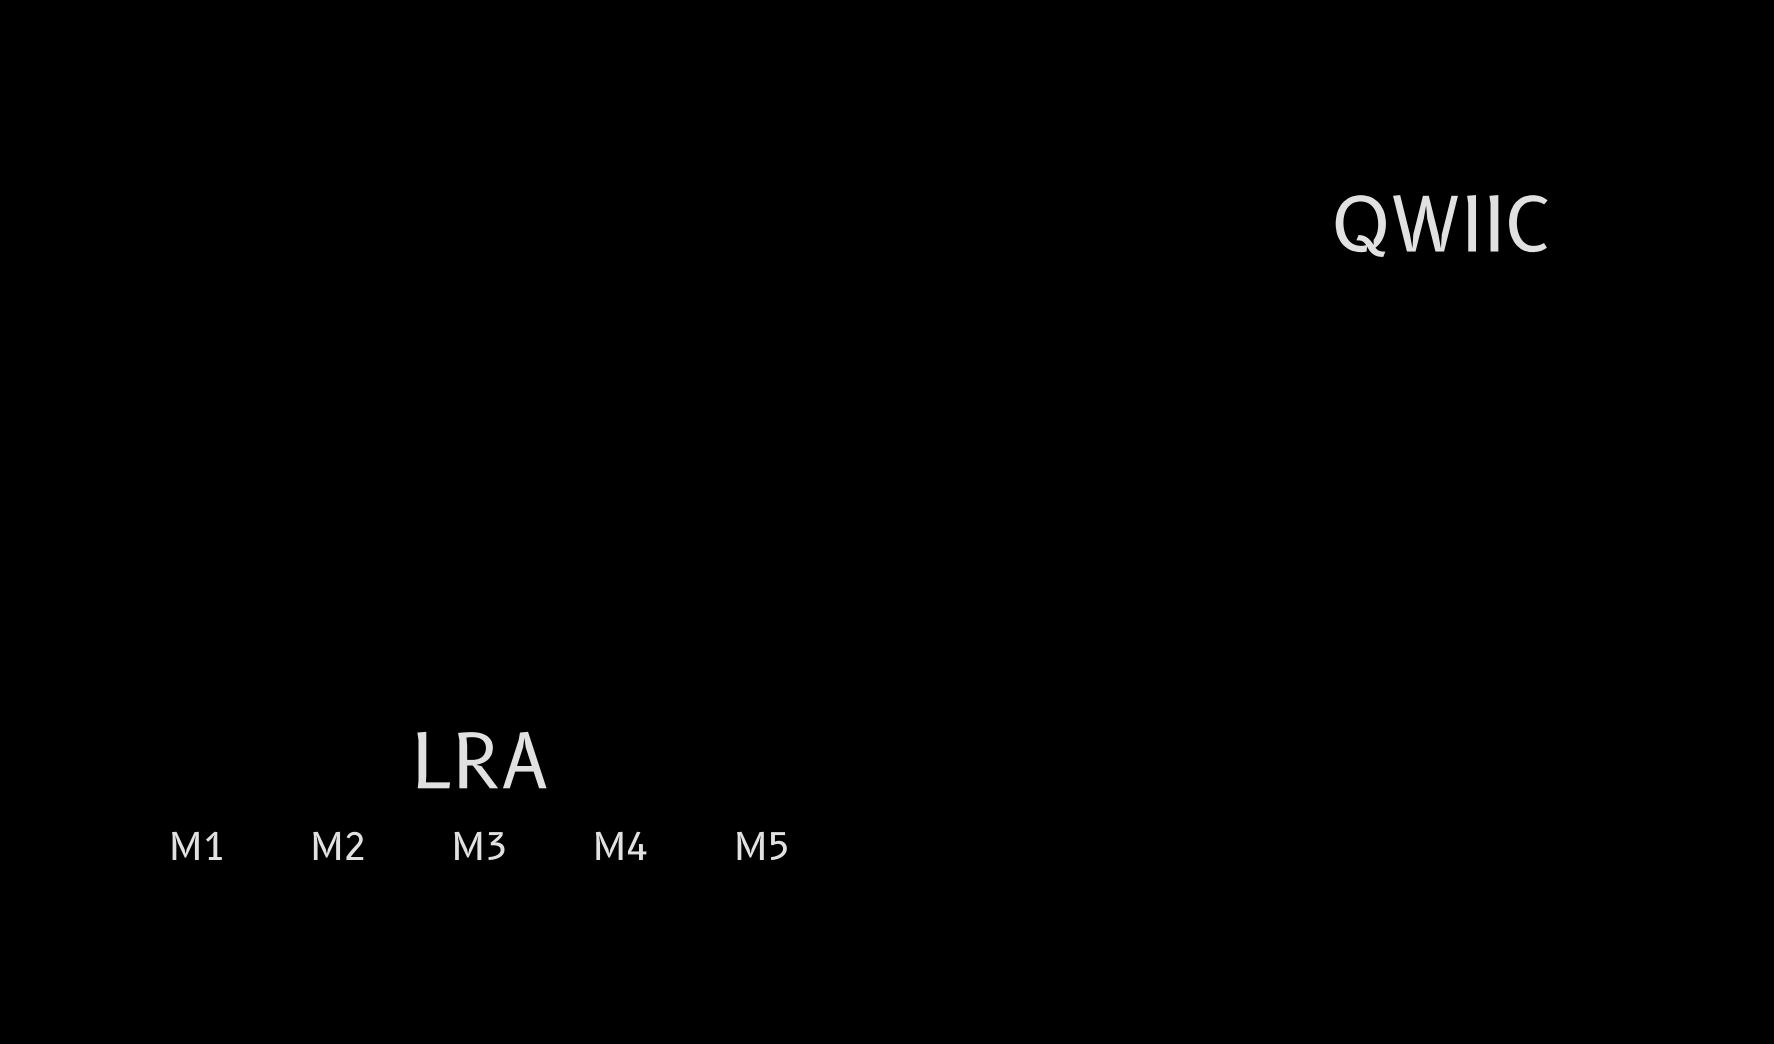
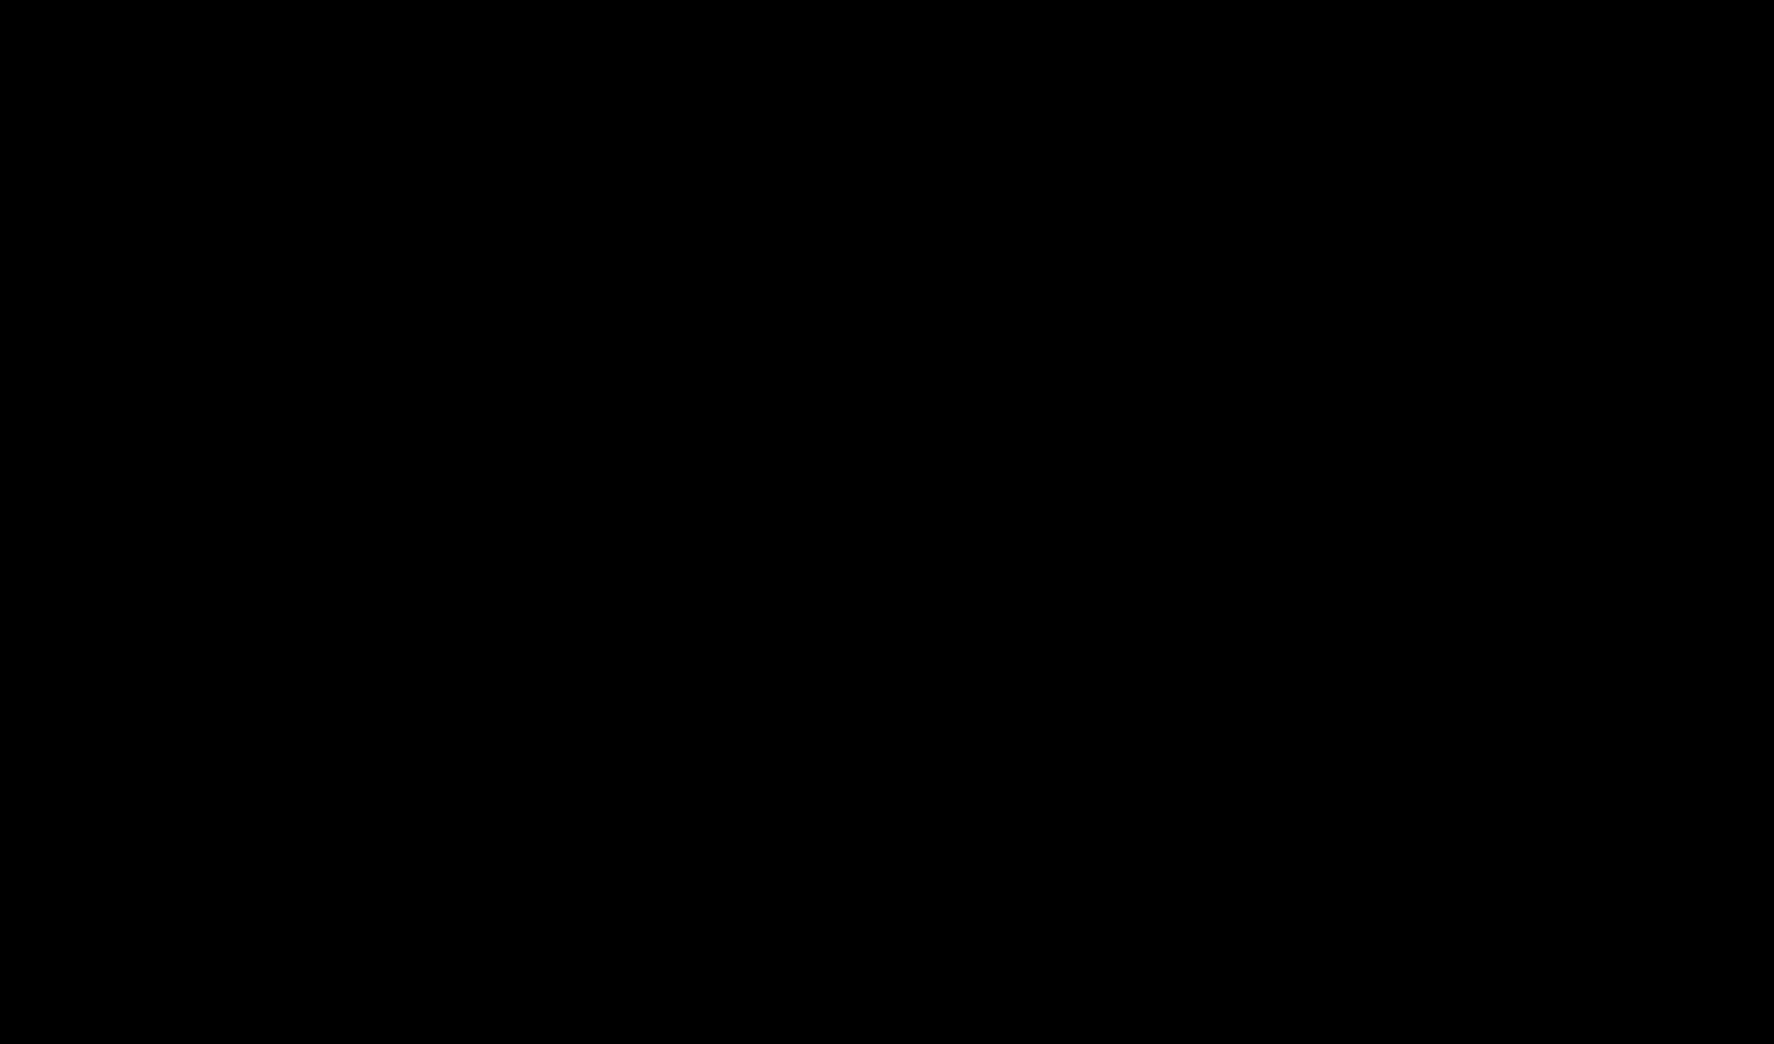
text: QWIIC (1441, 225) -> none
text: LRA (481, 760) -> none
text: M1 (196, 845) -> none
text: M2 (338, 845) -> none
text: M3 (479, 845) -> none
text: M4 (621, 845) -> none
text: M5 (761, 845) -> none

